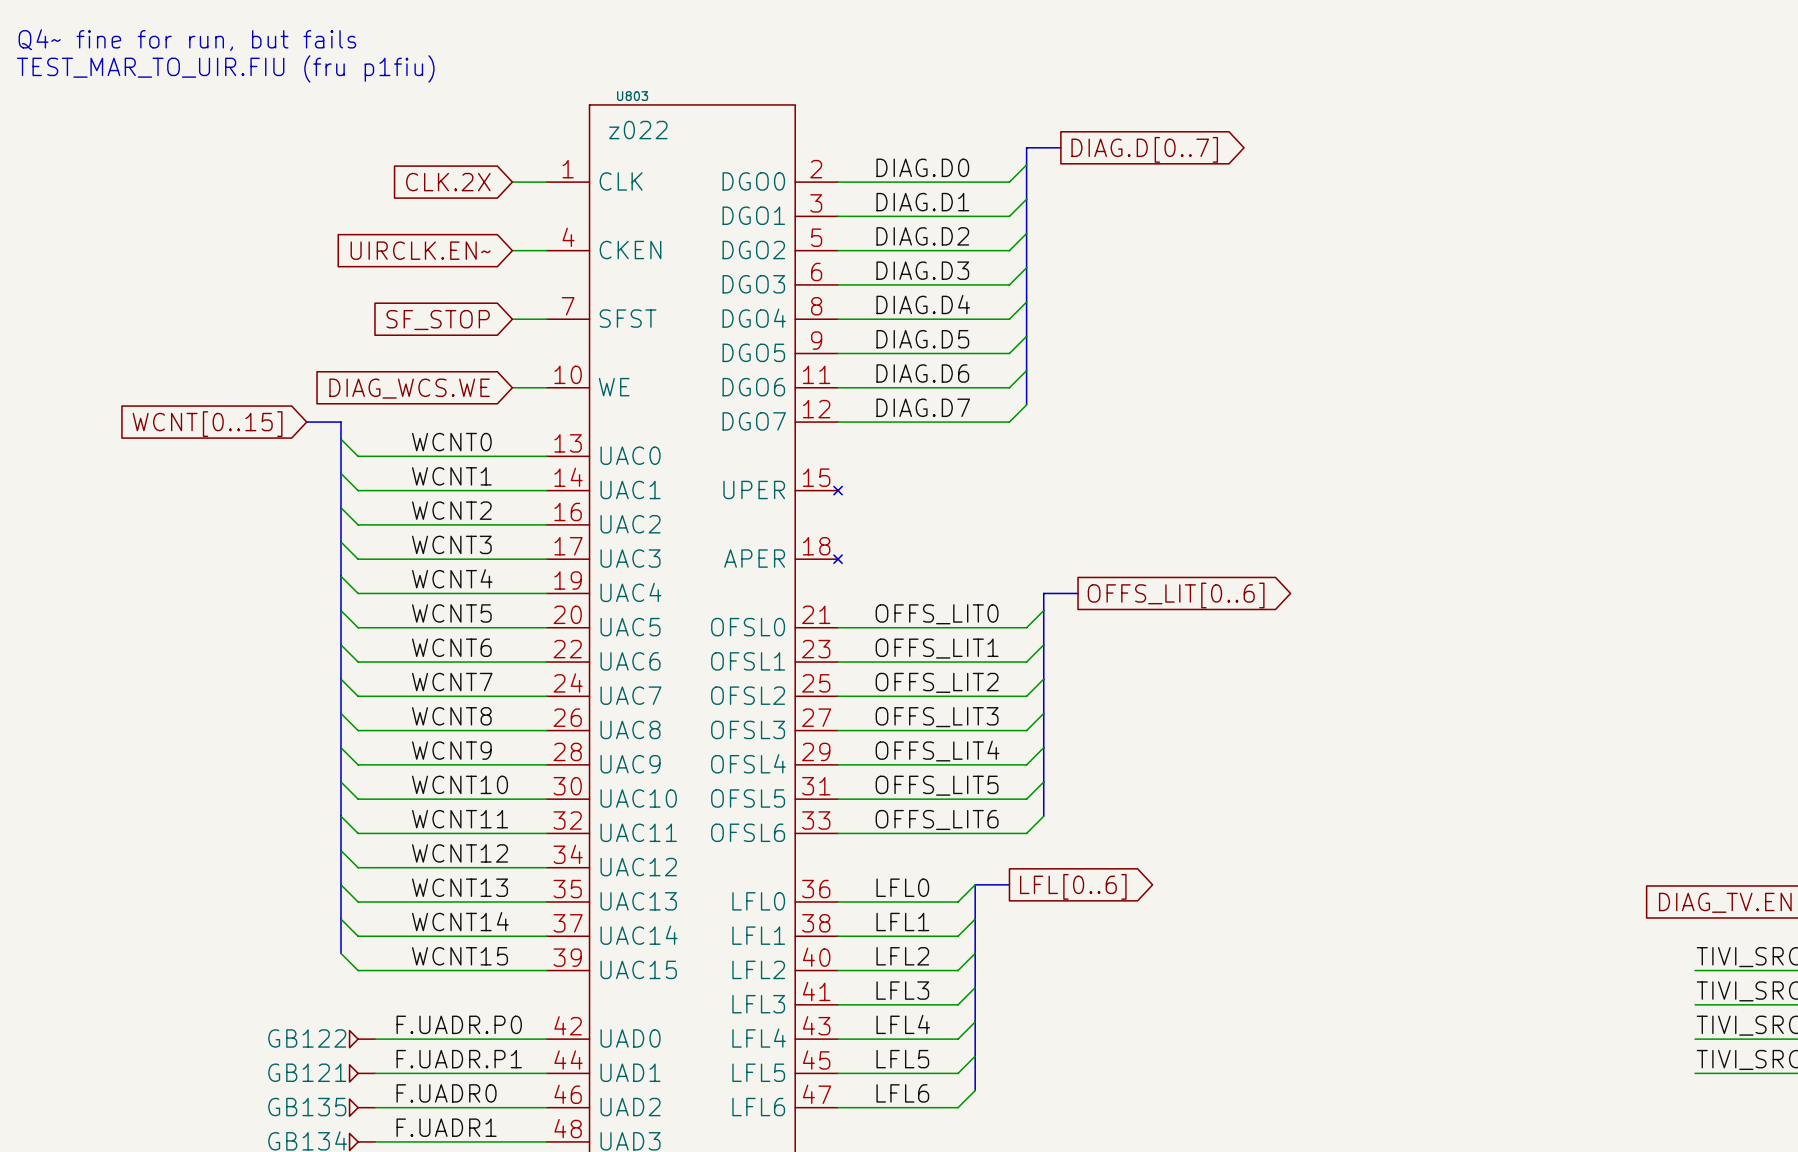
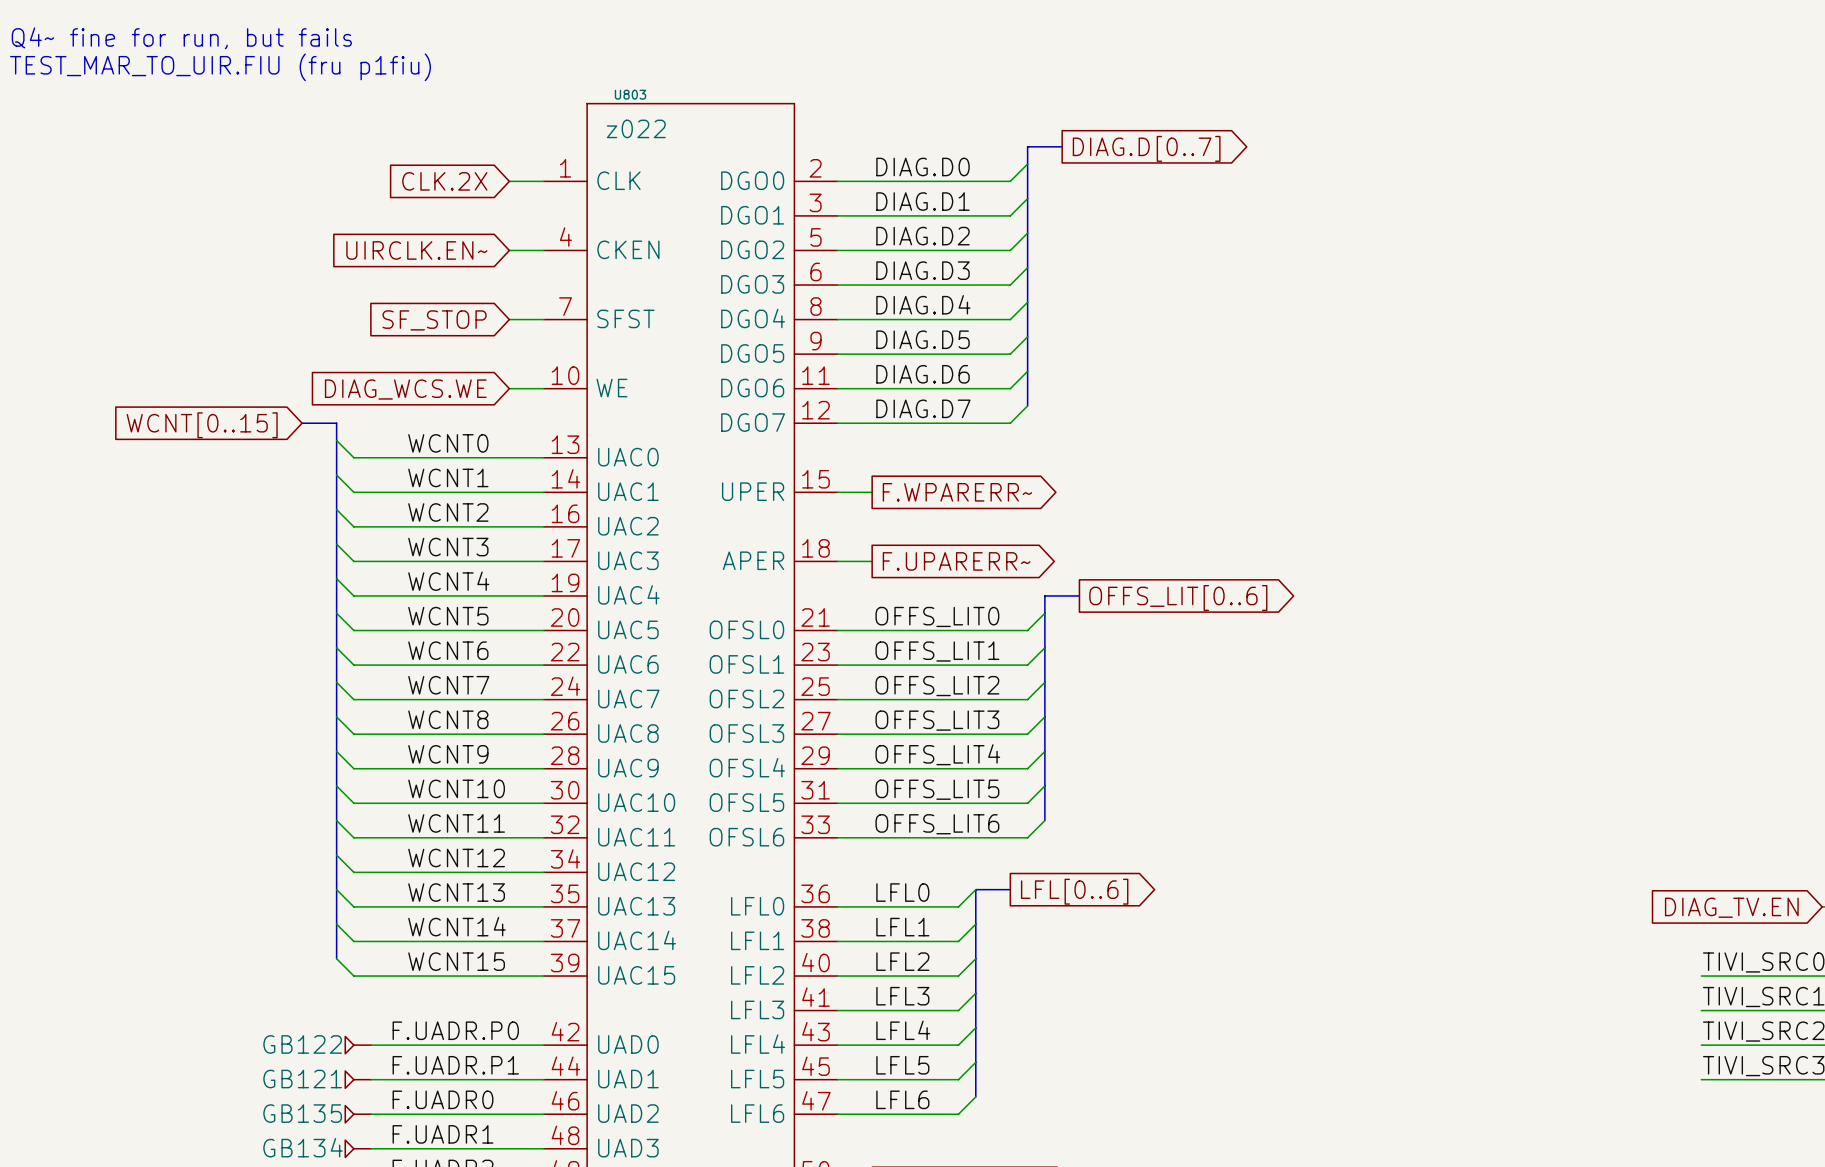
wire: none -> (837, 492) (872, 492)
no-connect mark: (838, 490) -> none
global label: none -> F.WPARERR~ (957, 492)
wire: none -> (837, 561) (872, 561)
no-connect mark: (838, 559) -> none
global label: none -> F.UPARERR~ (956, 561)

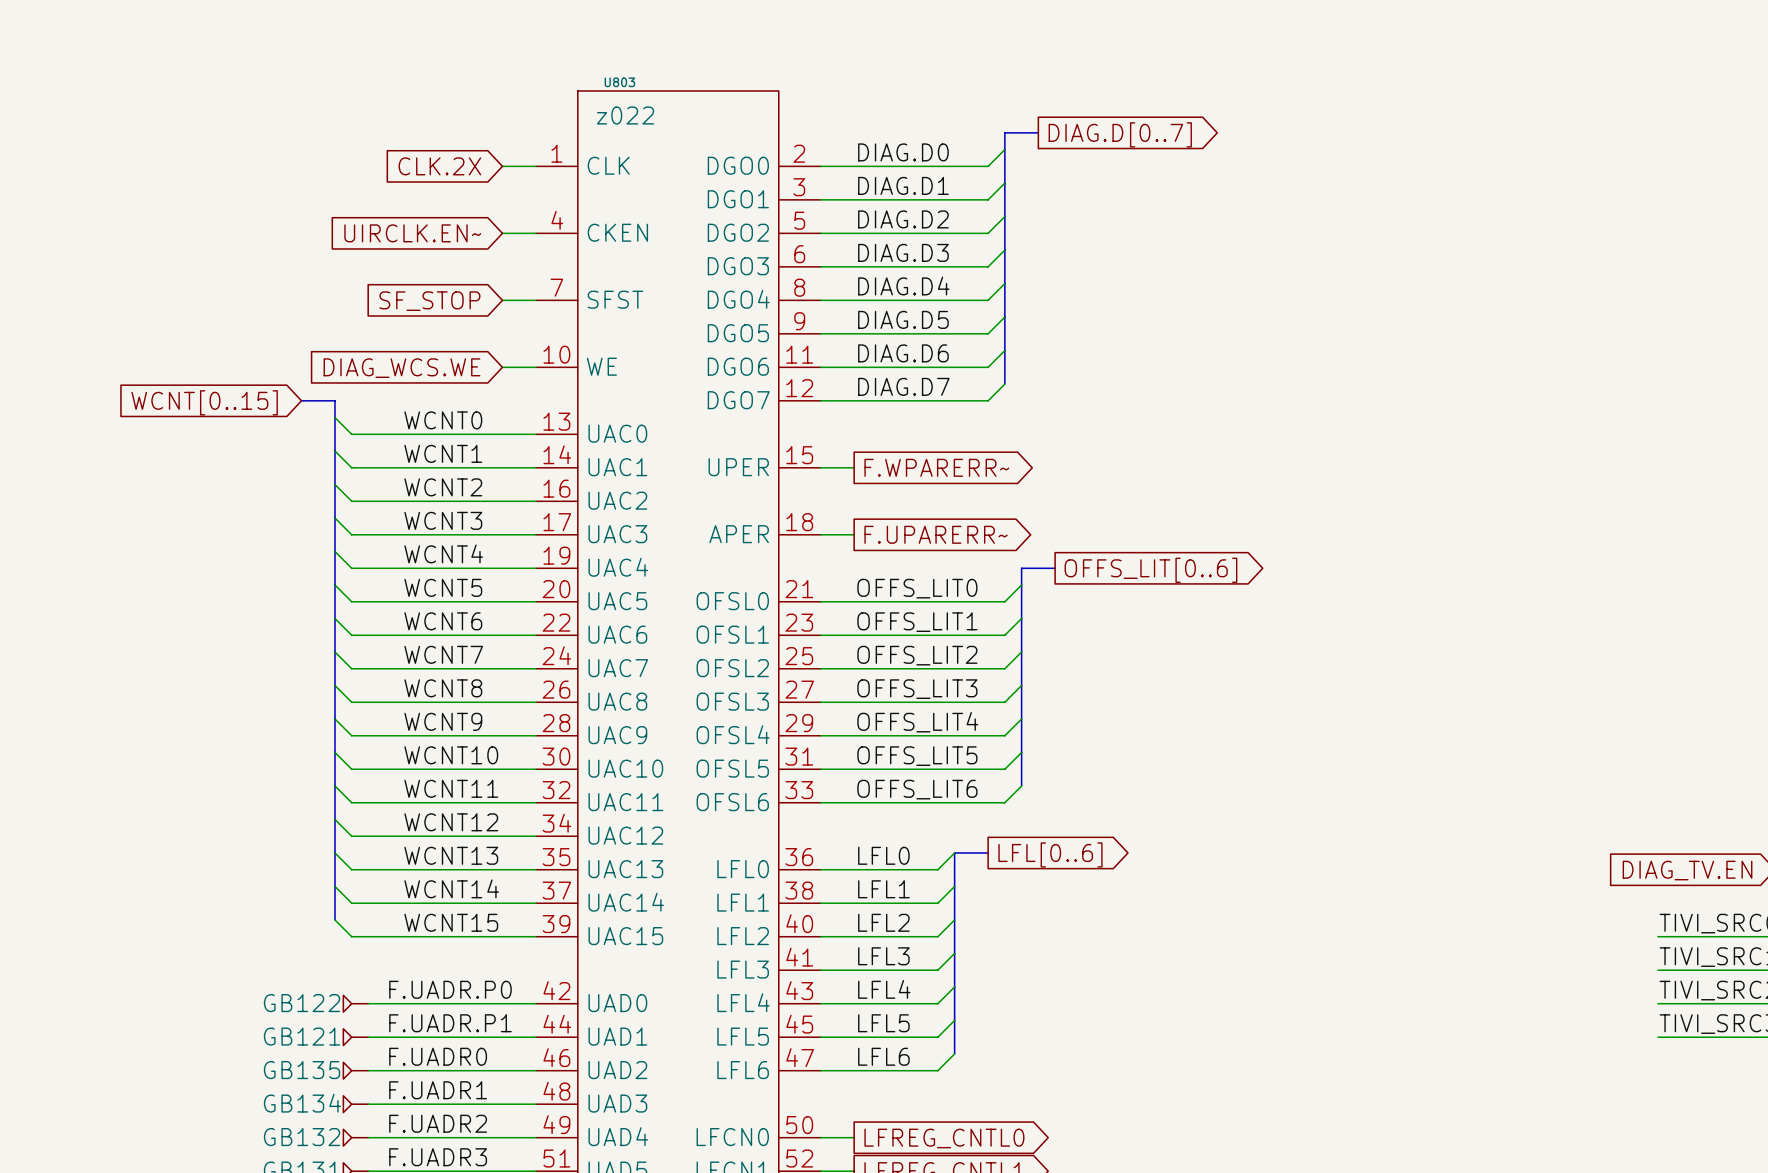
text: Q4~ fine for run, but fails (181, 38) -> none
text: TEST_MAR_TO_UIR.FIU (fru p1fiu) (220, 67) -> none

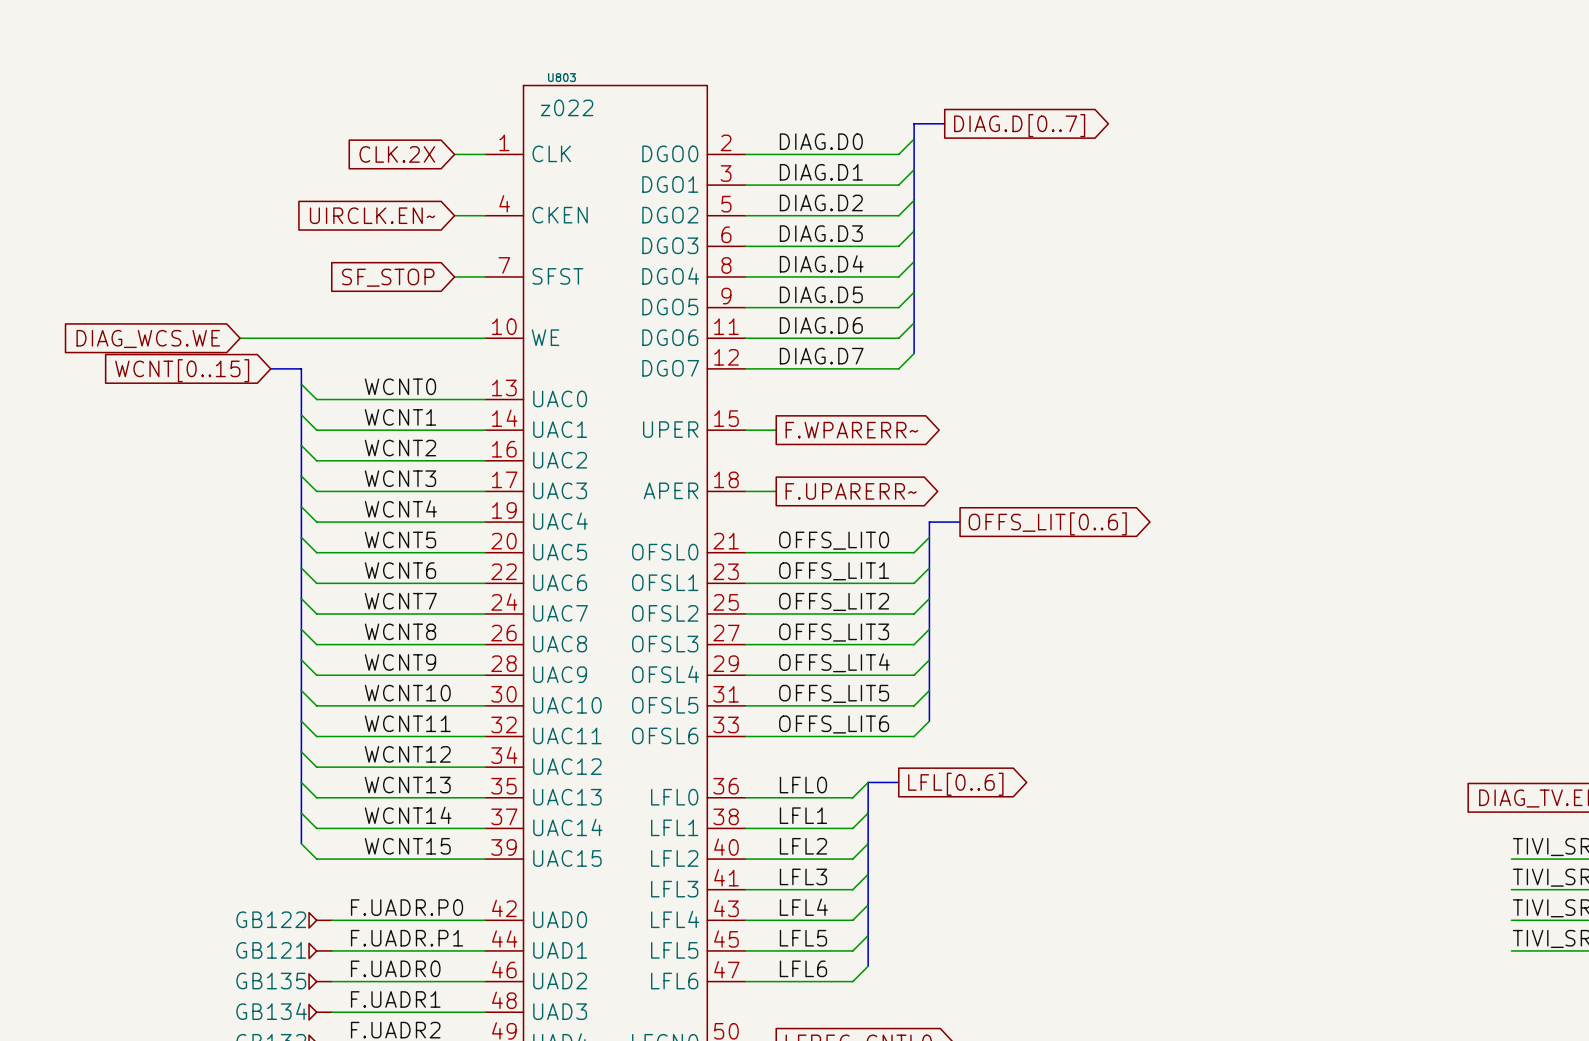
wire: none -> (240, 338) (454, 338)
global label: none -> DIAG_WCS.WE (148, 338)
global label: DIAG_WCS.WE (402, 368) -> none

